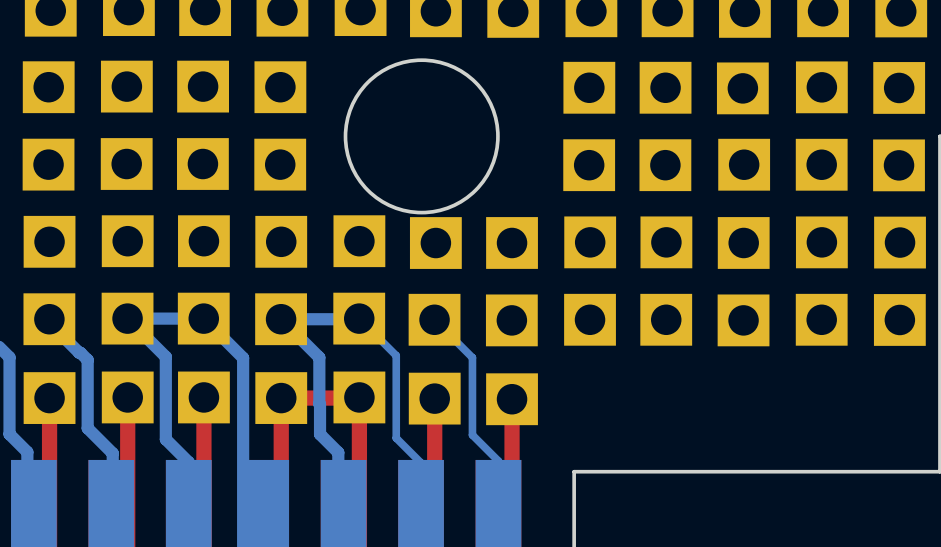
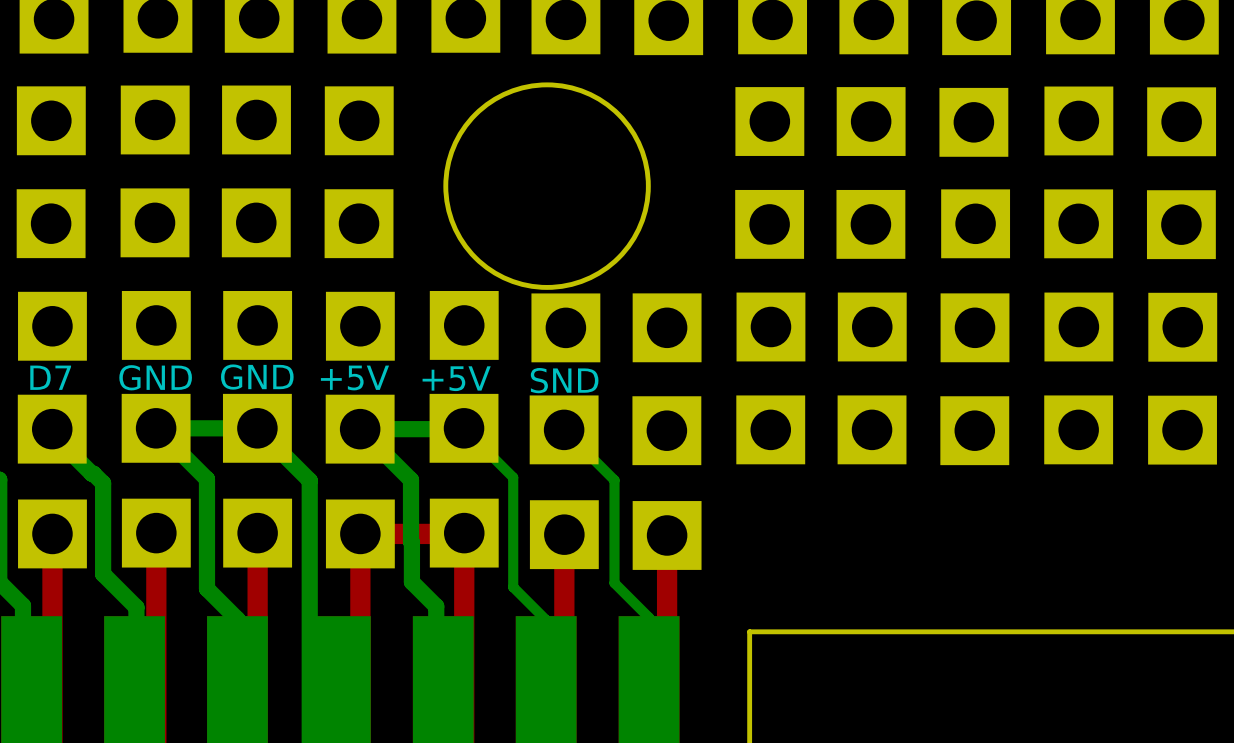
text: none -> D7 (50, 377)
text: none -> GND (155, 377)
text: none -> GND (257, 377)
text: none -> +5V (354, 377)
text: none -> +5V (456, 378)
text: none -> SND (564, 380)

